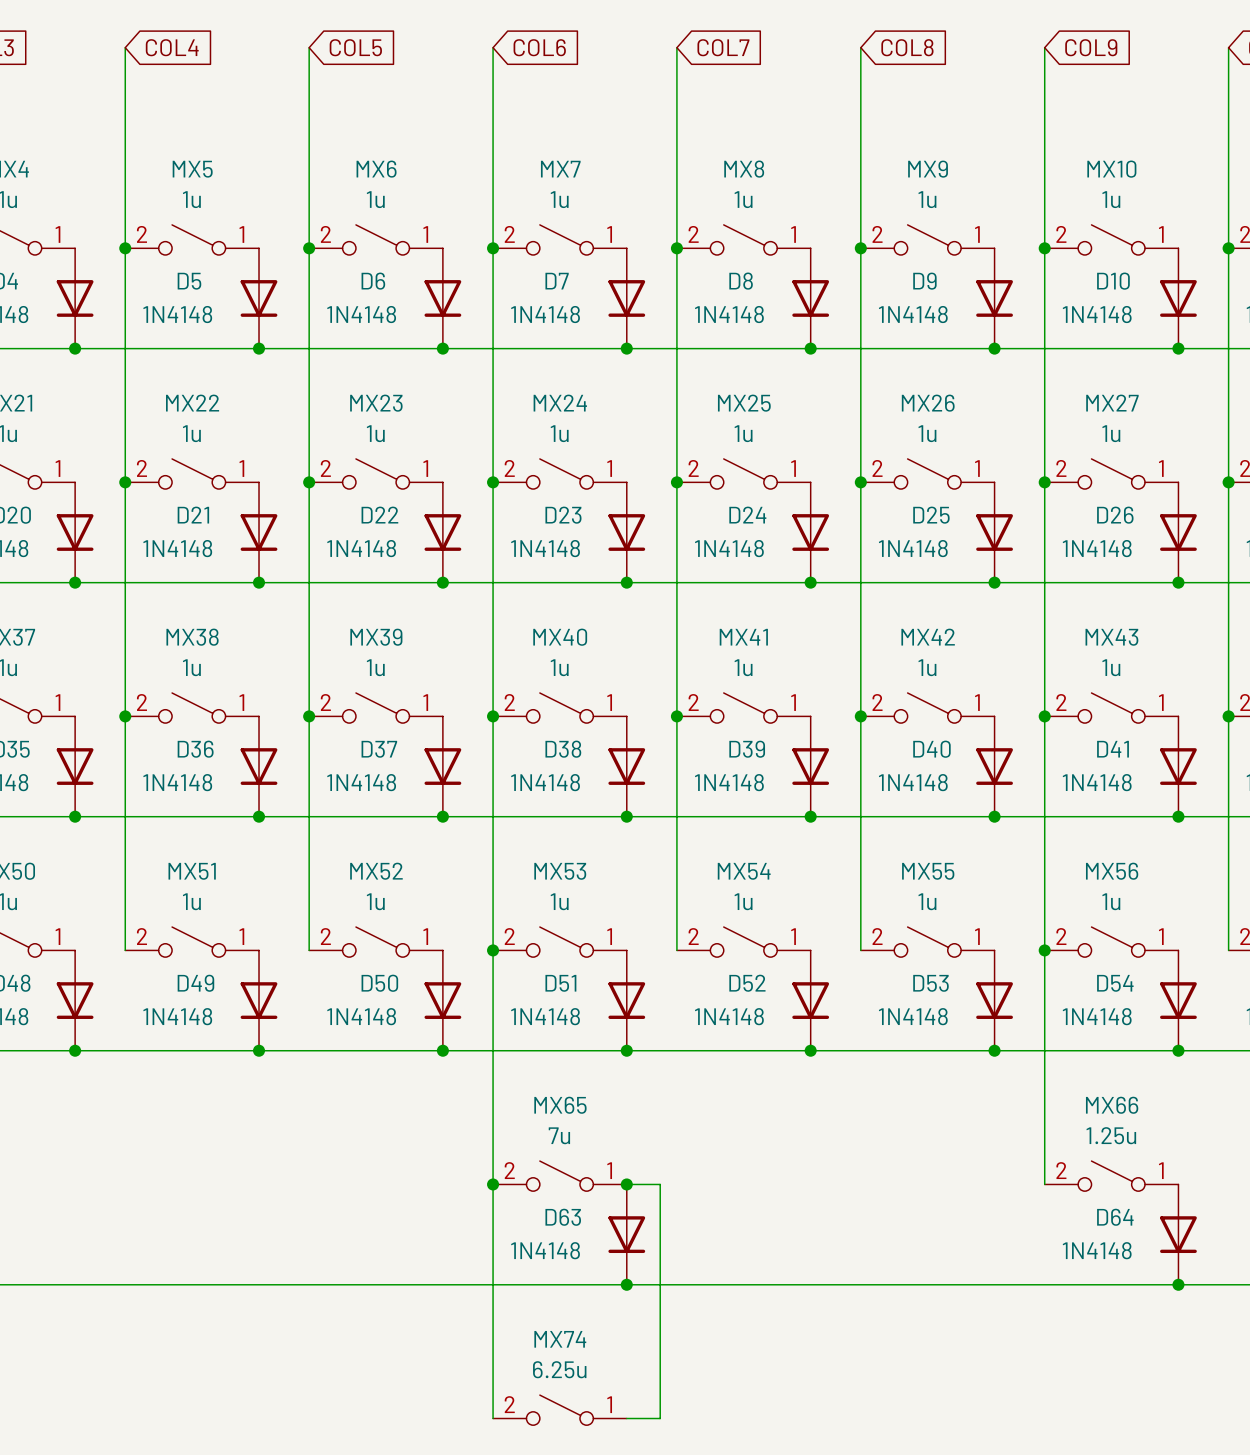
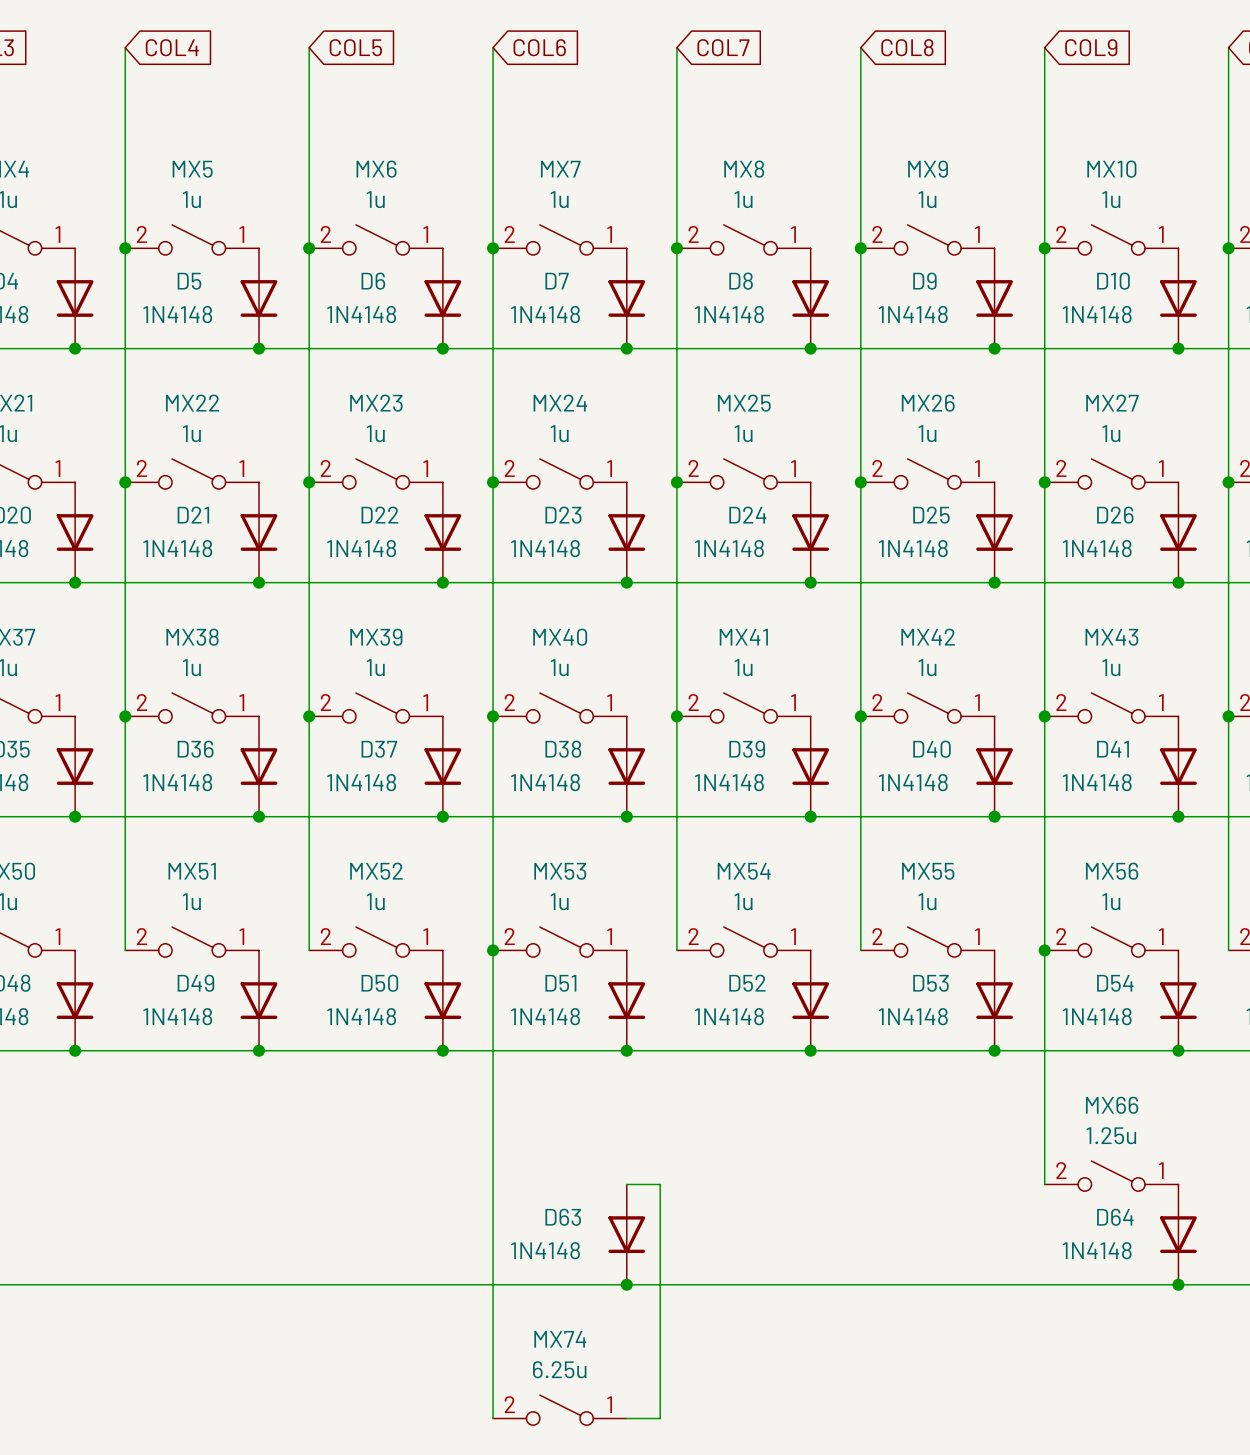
MX65: 7u (559, 1176) -> none
junction: (493, 1184) -> none
junction: (626, 1184) -> none

